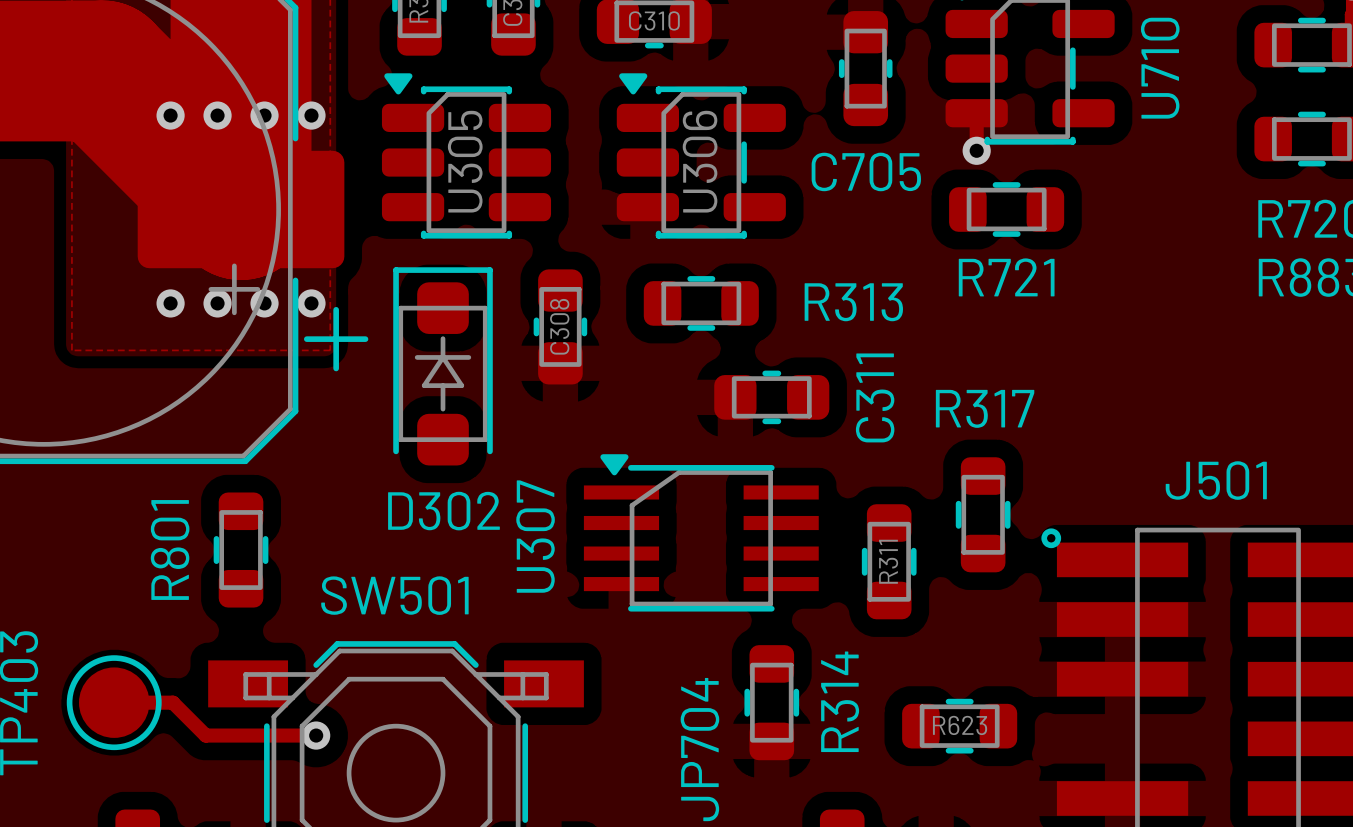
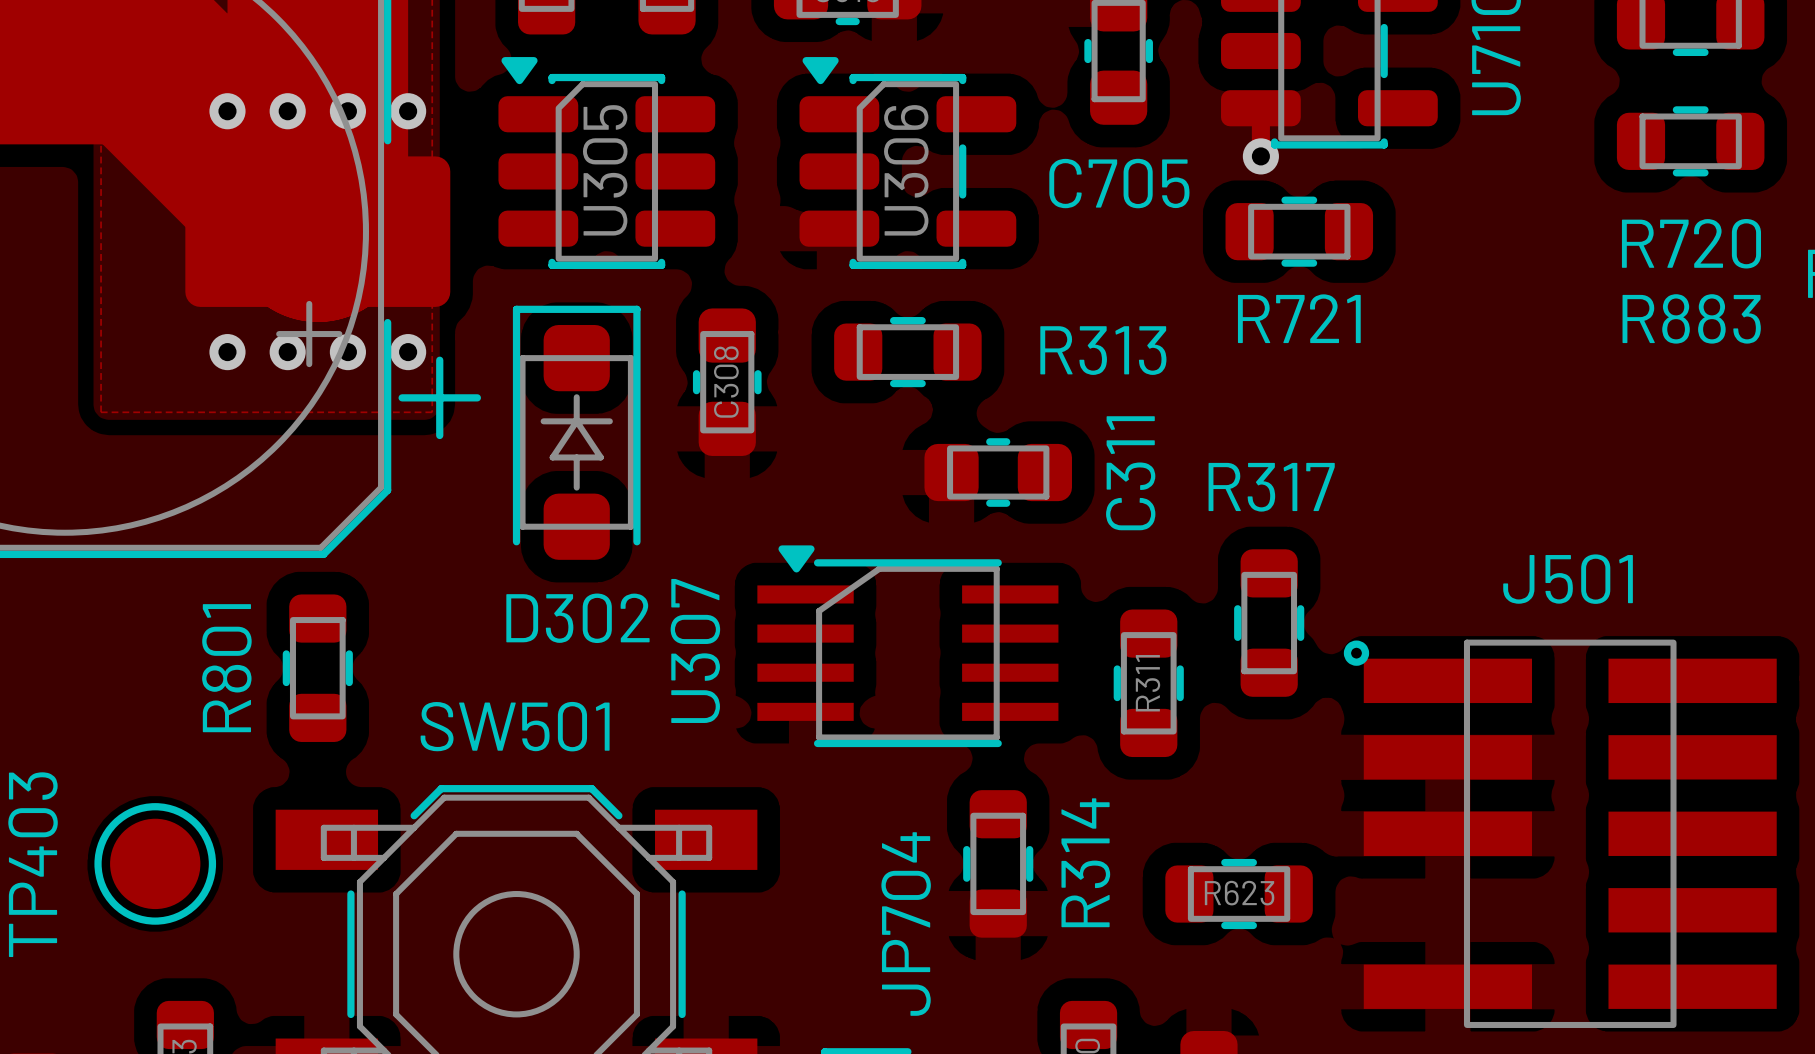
track: (114, 702) (172, 702) (205, 735) (316, 735) -> none
via: (316, 735) -> none

